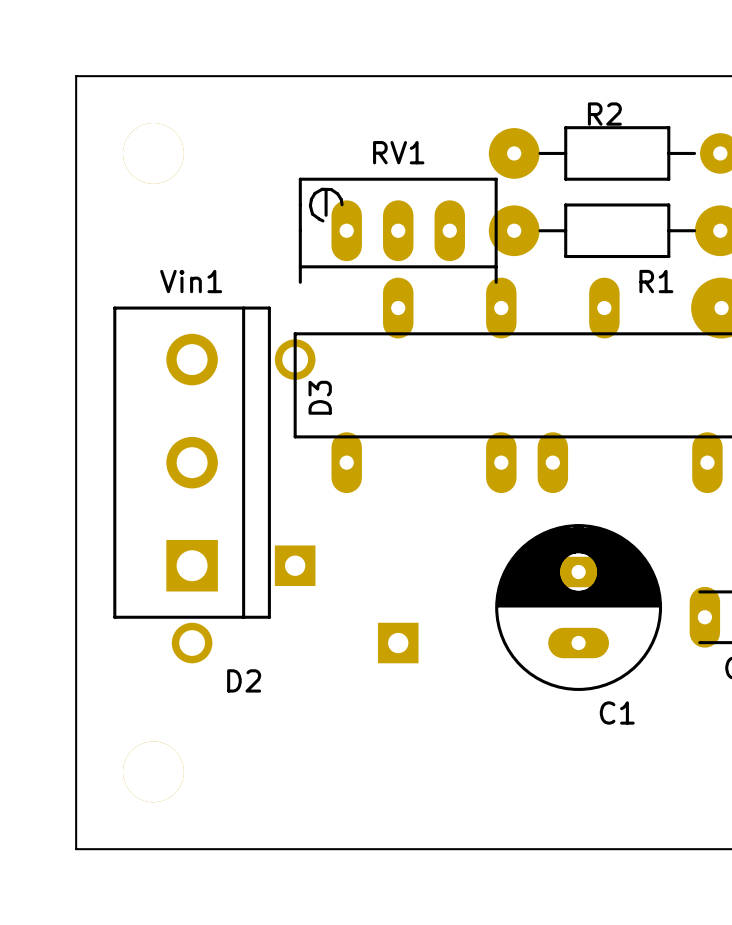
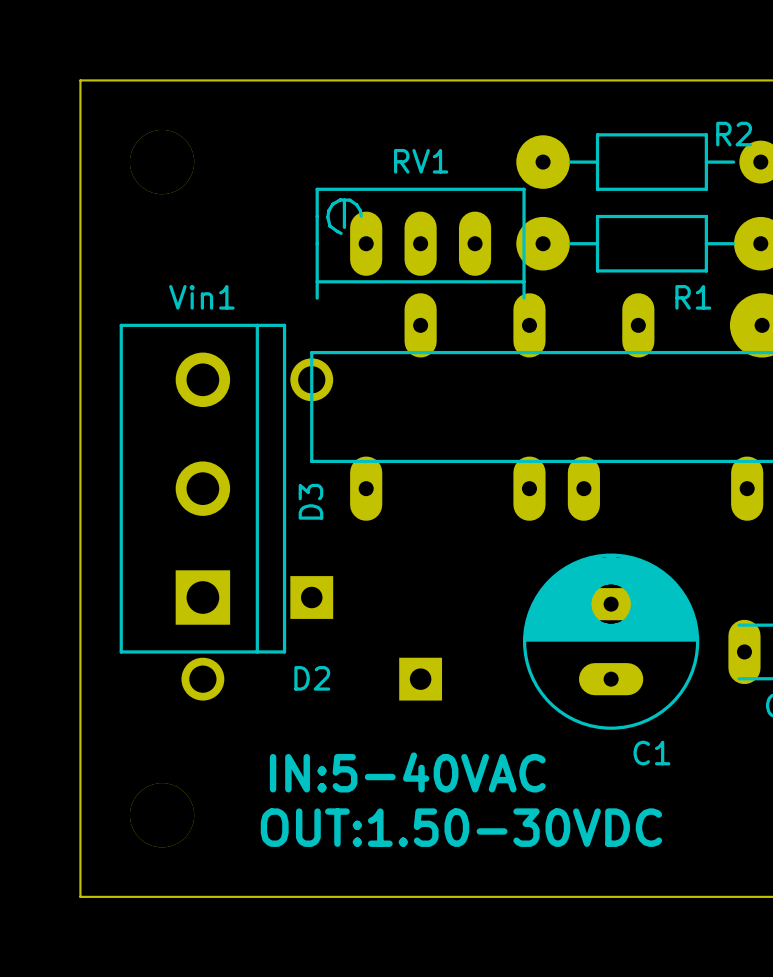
R2 name position: R2 (604, 114) -> R2 (734, 134)
D3 name position: D3 (320, 397) -> D3 (310, 501)
D2 name position: D2 (244, 680) -> D2 (312, 678)
text: none -> IN:5-40VAC (407, 772)
text: none -> OUT:1.50-30VDC (461, 827)

